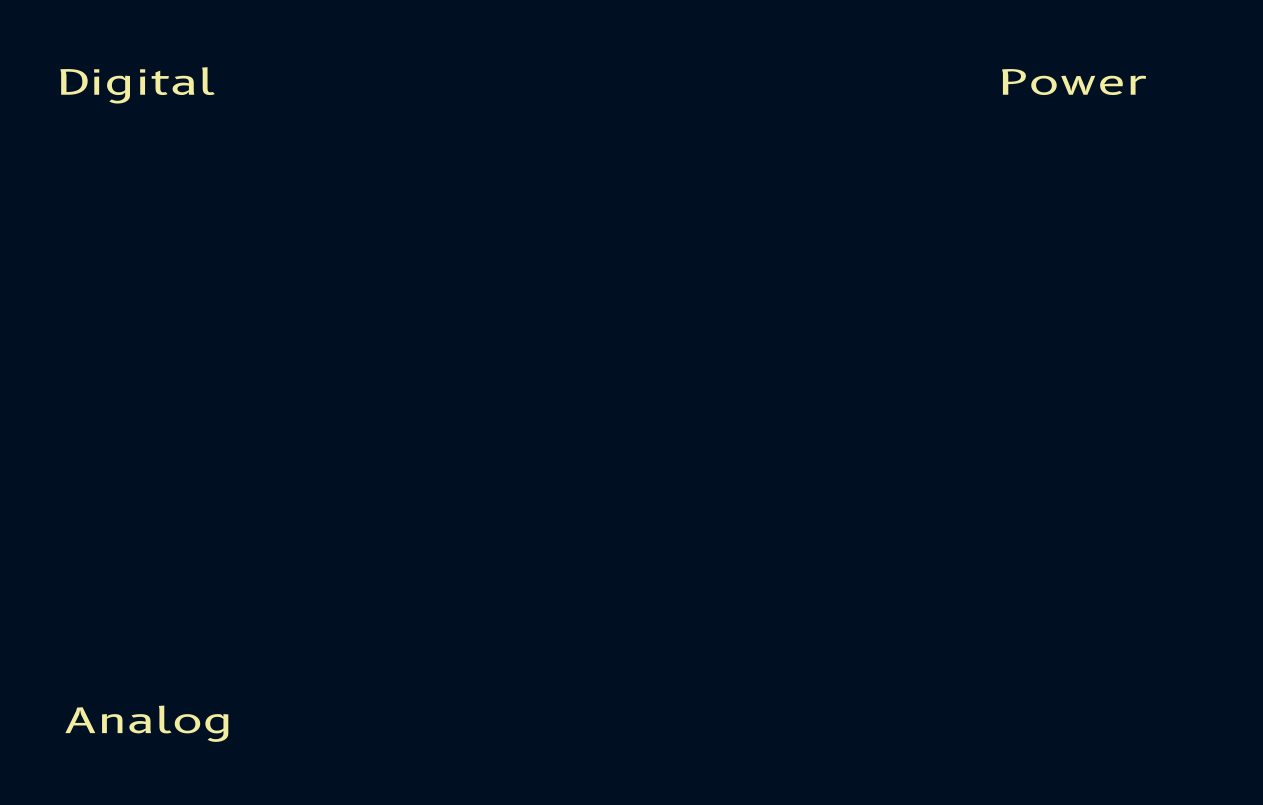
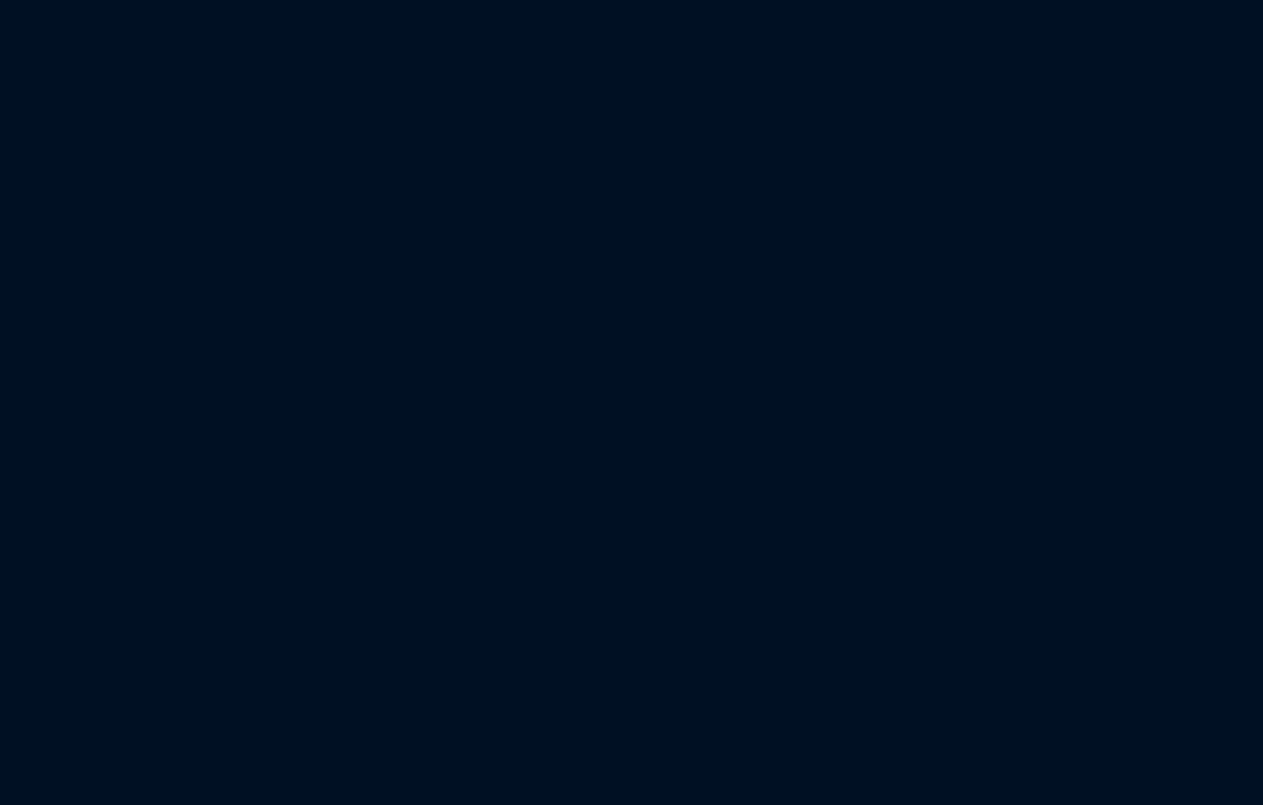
text: Power (1074, 82) -> none
text: Digital (137, 85) -> none
text: Analog (146, 723) -> none

